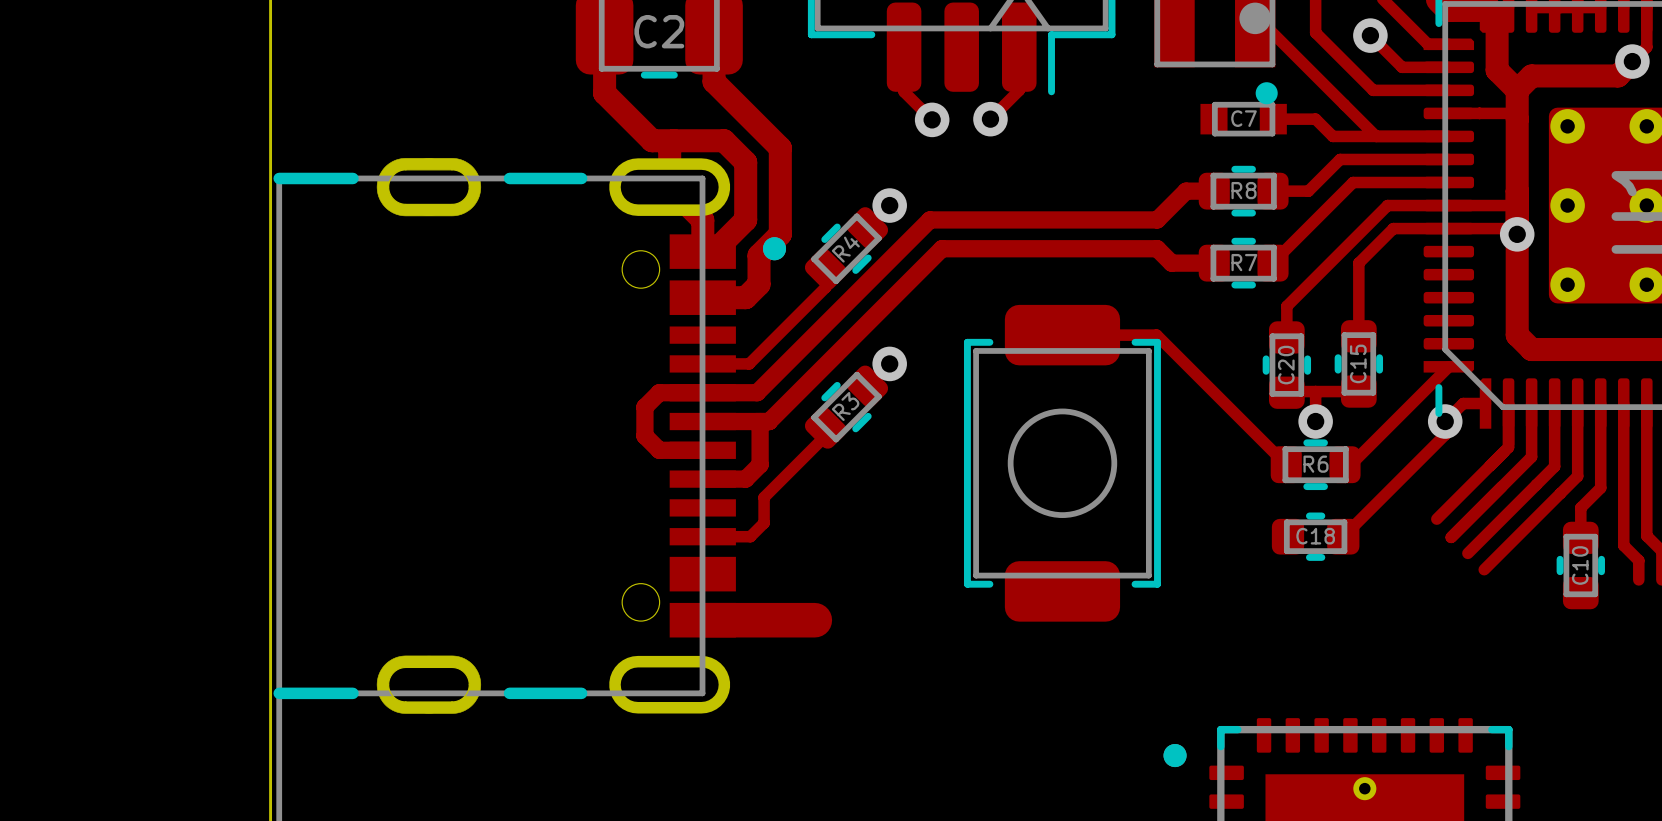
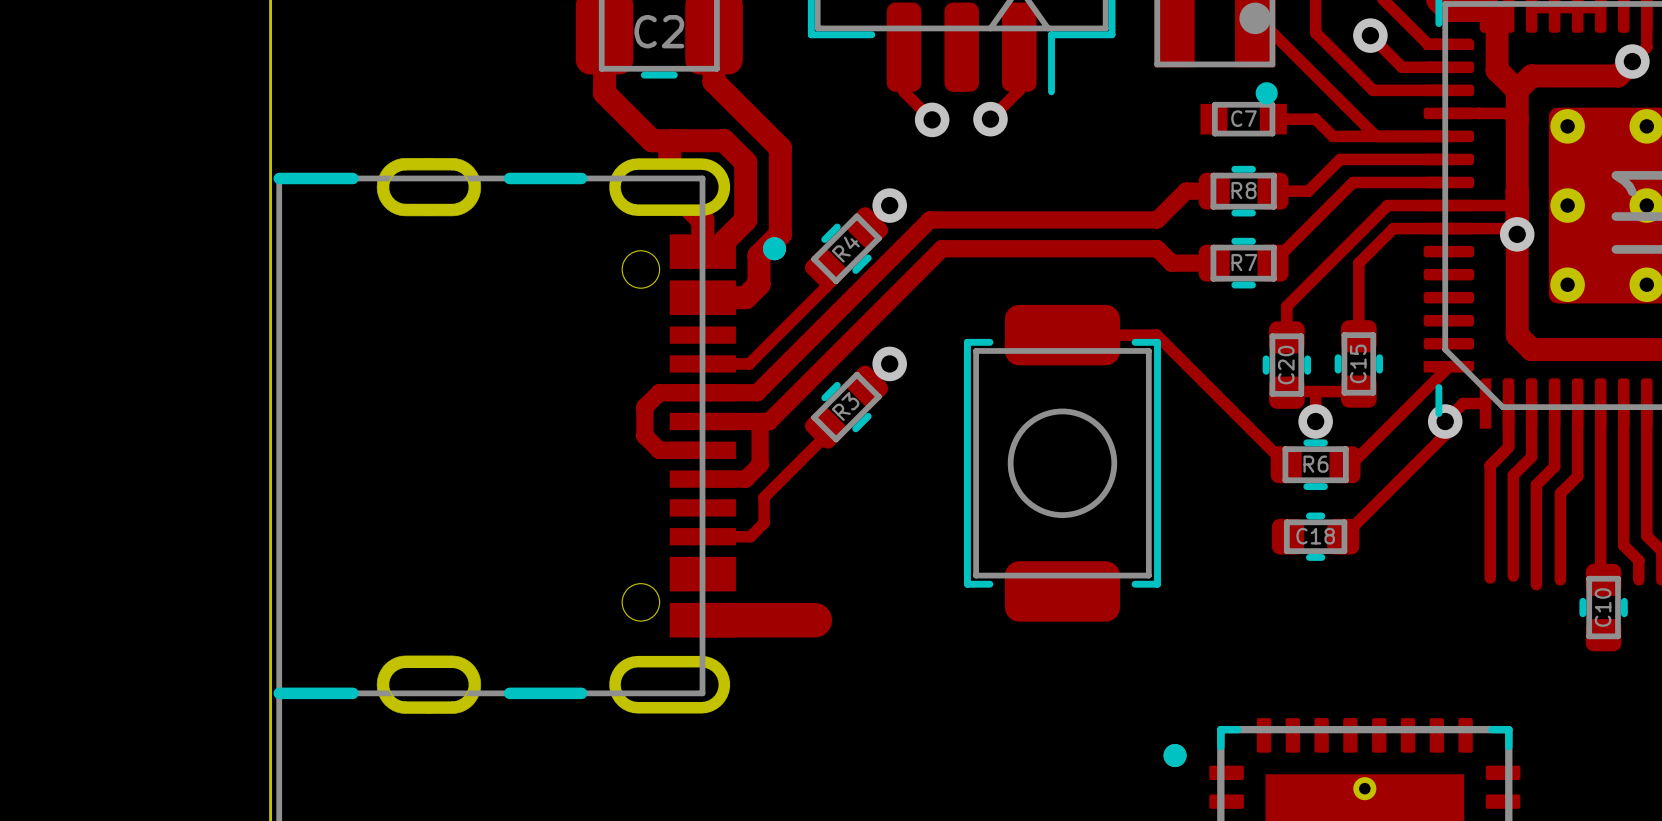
top track: (1490, 465) (1436, 519) -> (1490, 465) (1490, 578)
top track: (1513, 475) (1451, 537) -> (1513, 475) (1513, 576)
top track: (1536, 484) (1467, 553) -> (1536, 484) (1536, 584)
top track: (1600, 487) (1580, 507) (1580, 537) -> (1600, 487) (1600, 577) (1603, 579)
top track: (1560, 493) (1484, 569) -> (1560, 493) (1560, 579)
C10 position: (1580, 565) -> (1603, 607)

